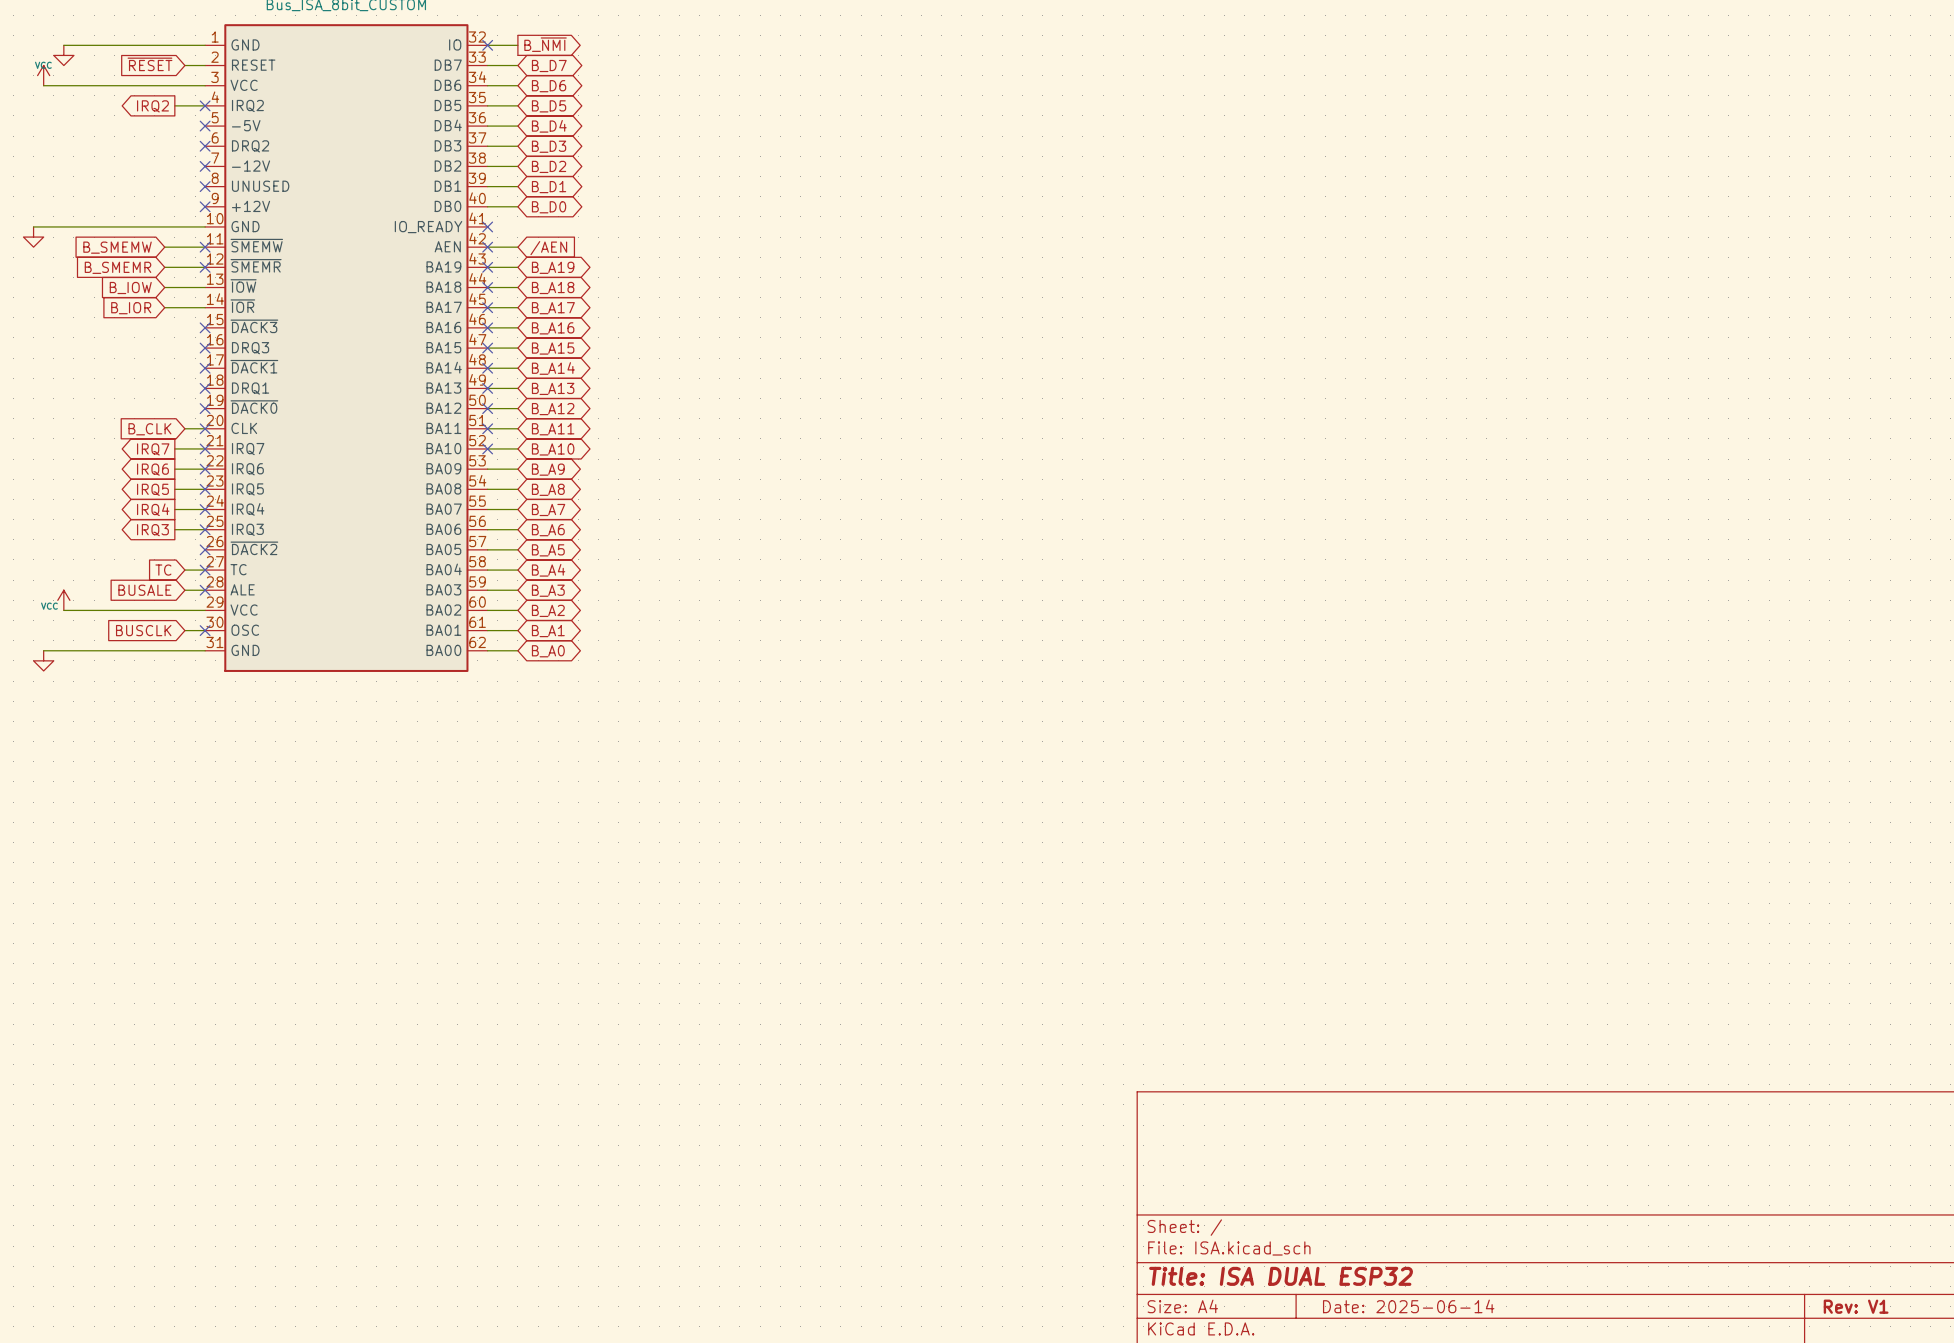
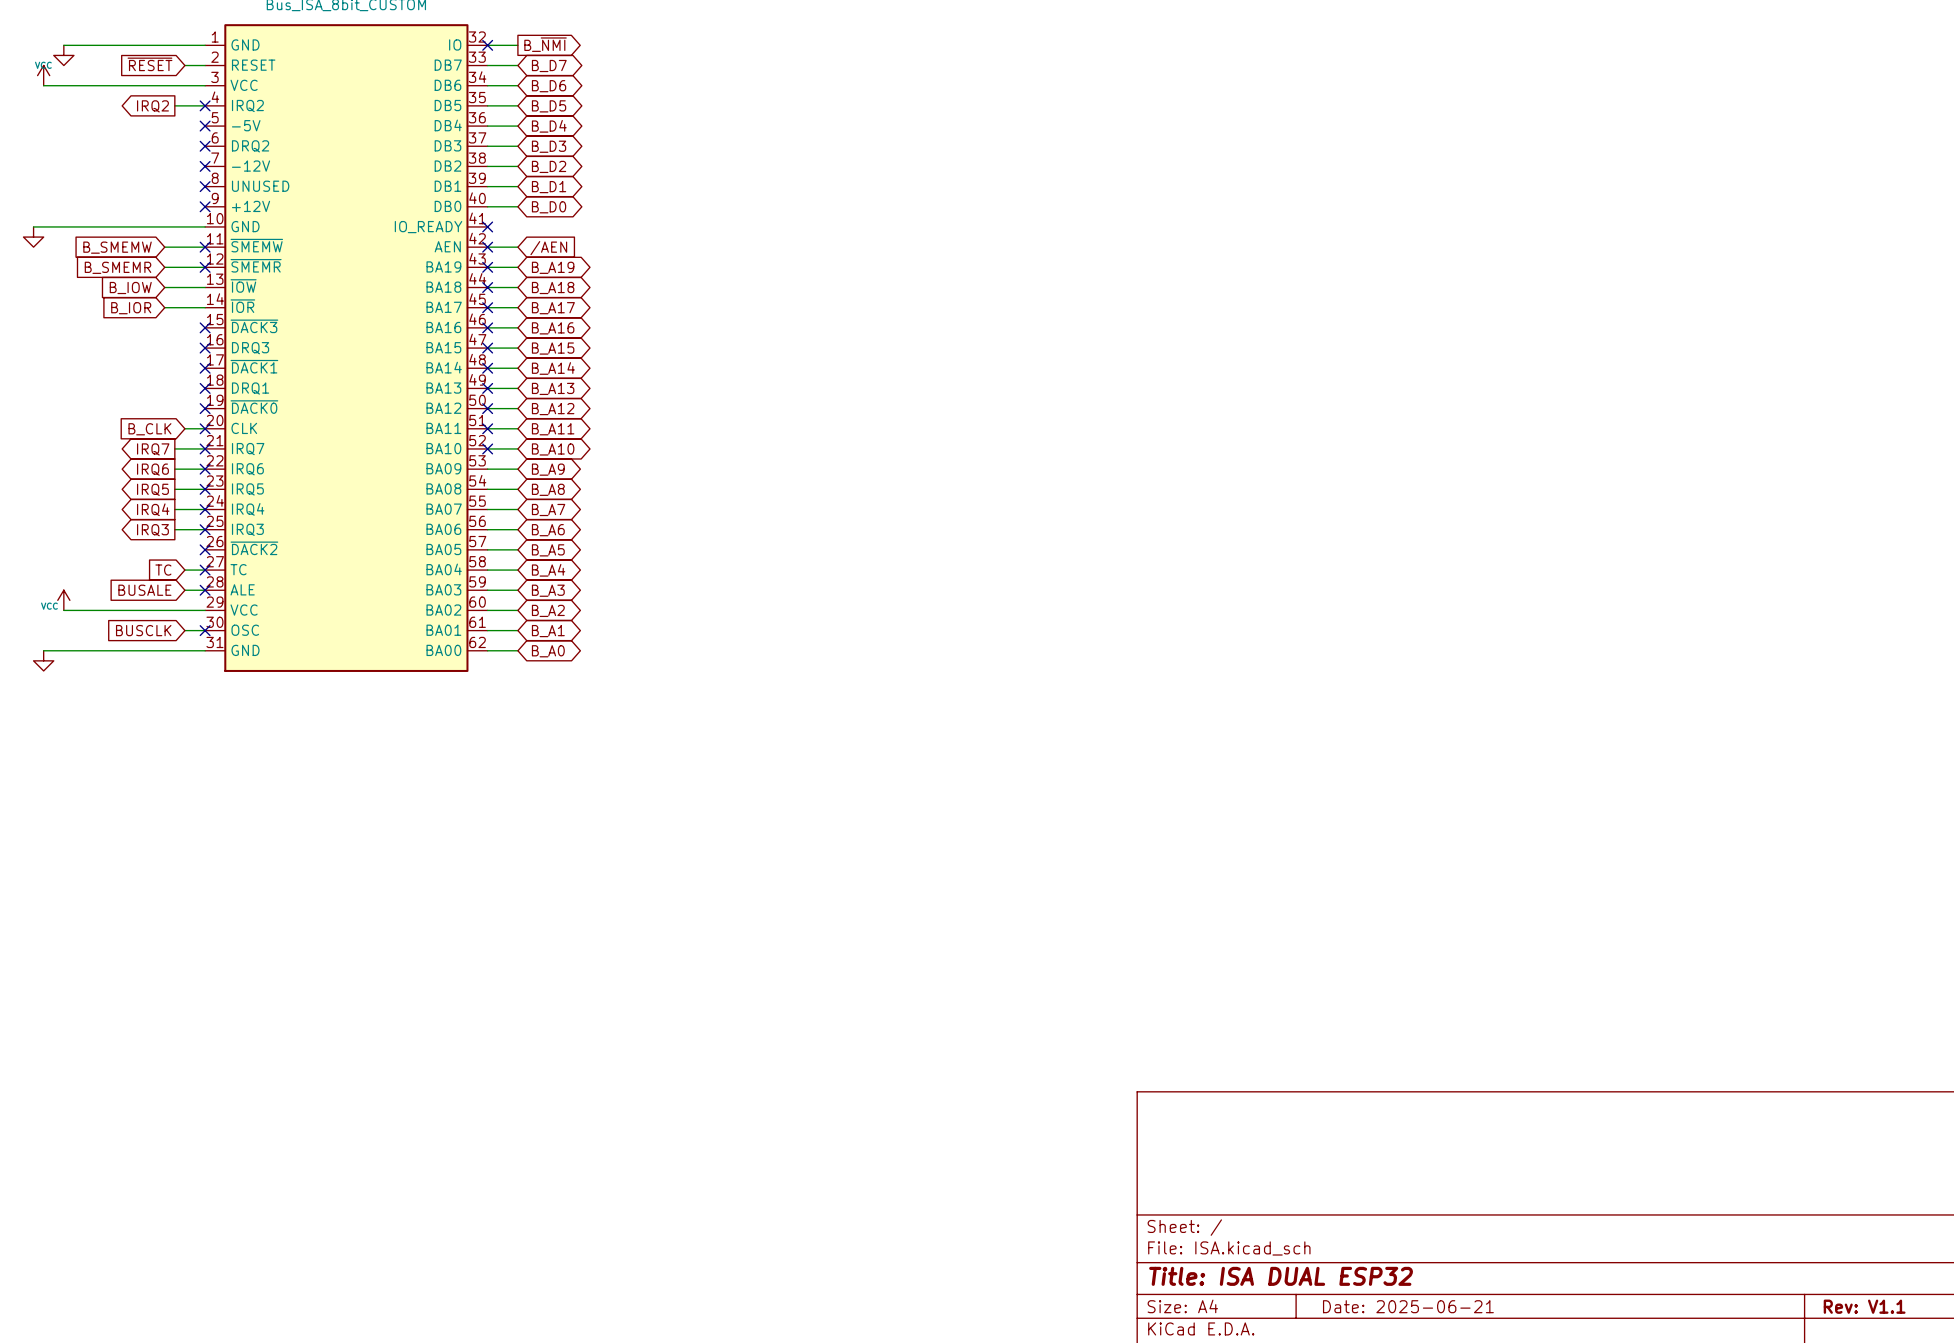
title block: Date: 2025-06-14 (1408, 1306) -> Date: 2025-06-21 (1408, 1306)
title block: Rev: V1 (1856, 1306) -> Rev: V1.1 (1864, 1306)

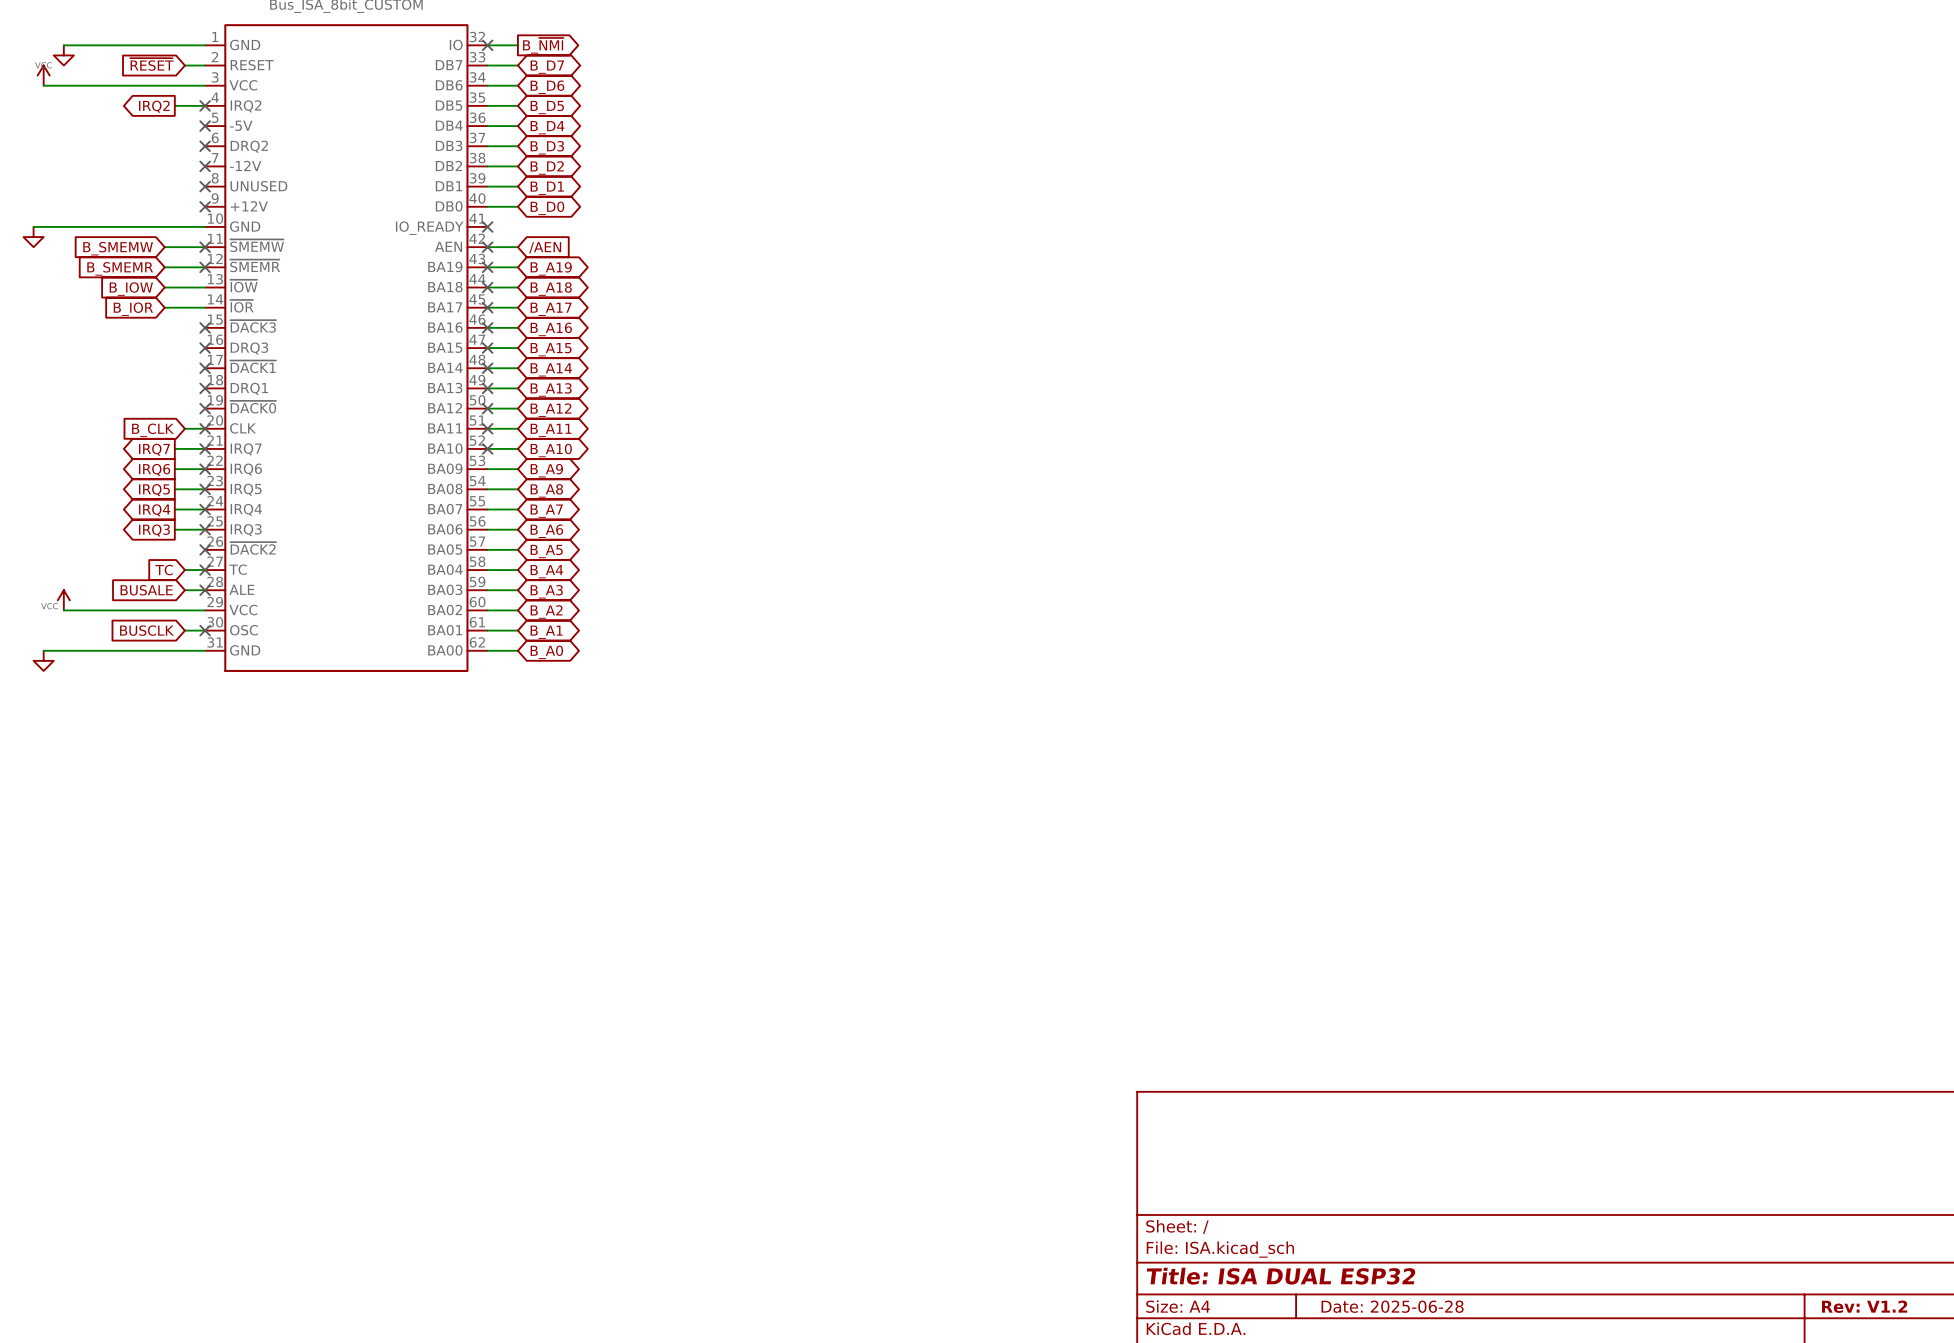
title block: Date: 2025-06-21 (1408, 1306) -> Date: 2025-06-28 (1392, 1306)
title block: Rev: V1.1 (1864, 1306) -> Rev: V1.2 (1864, 1306)

